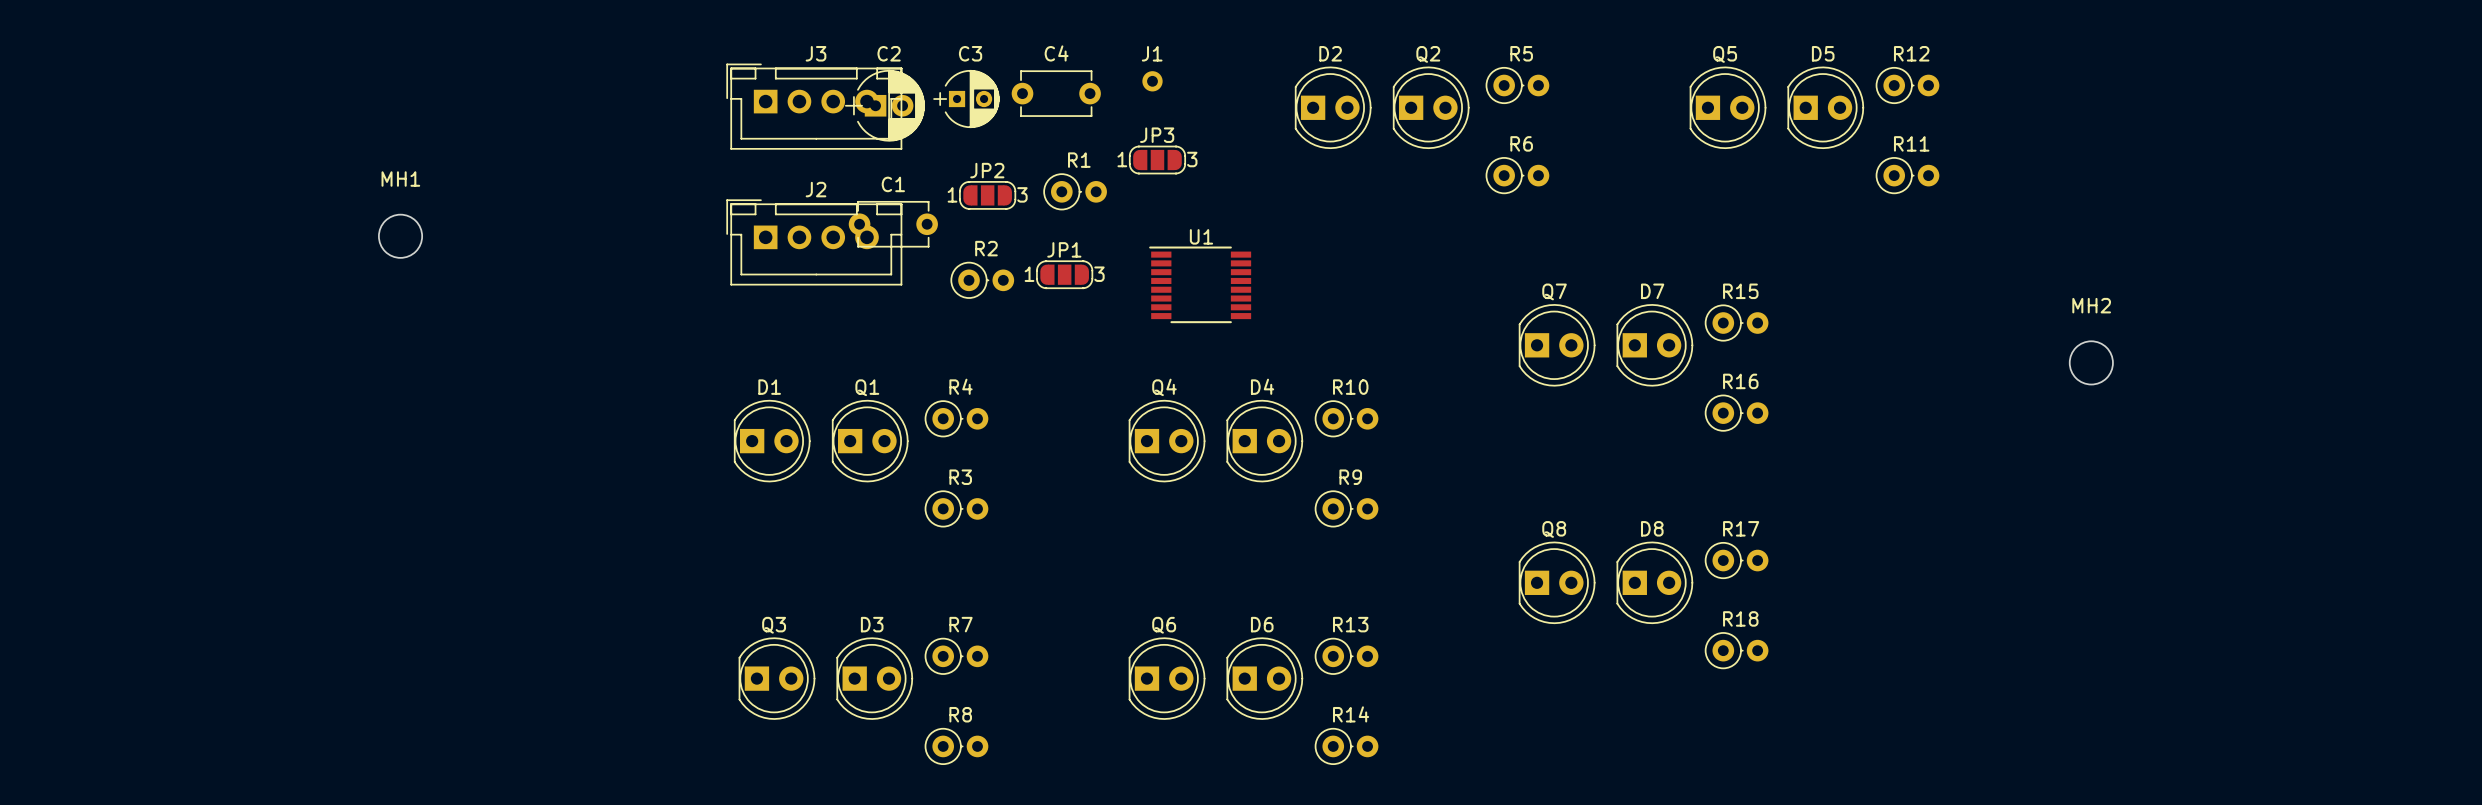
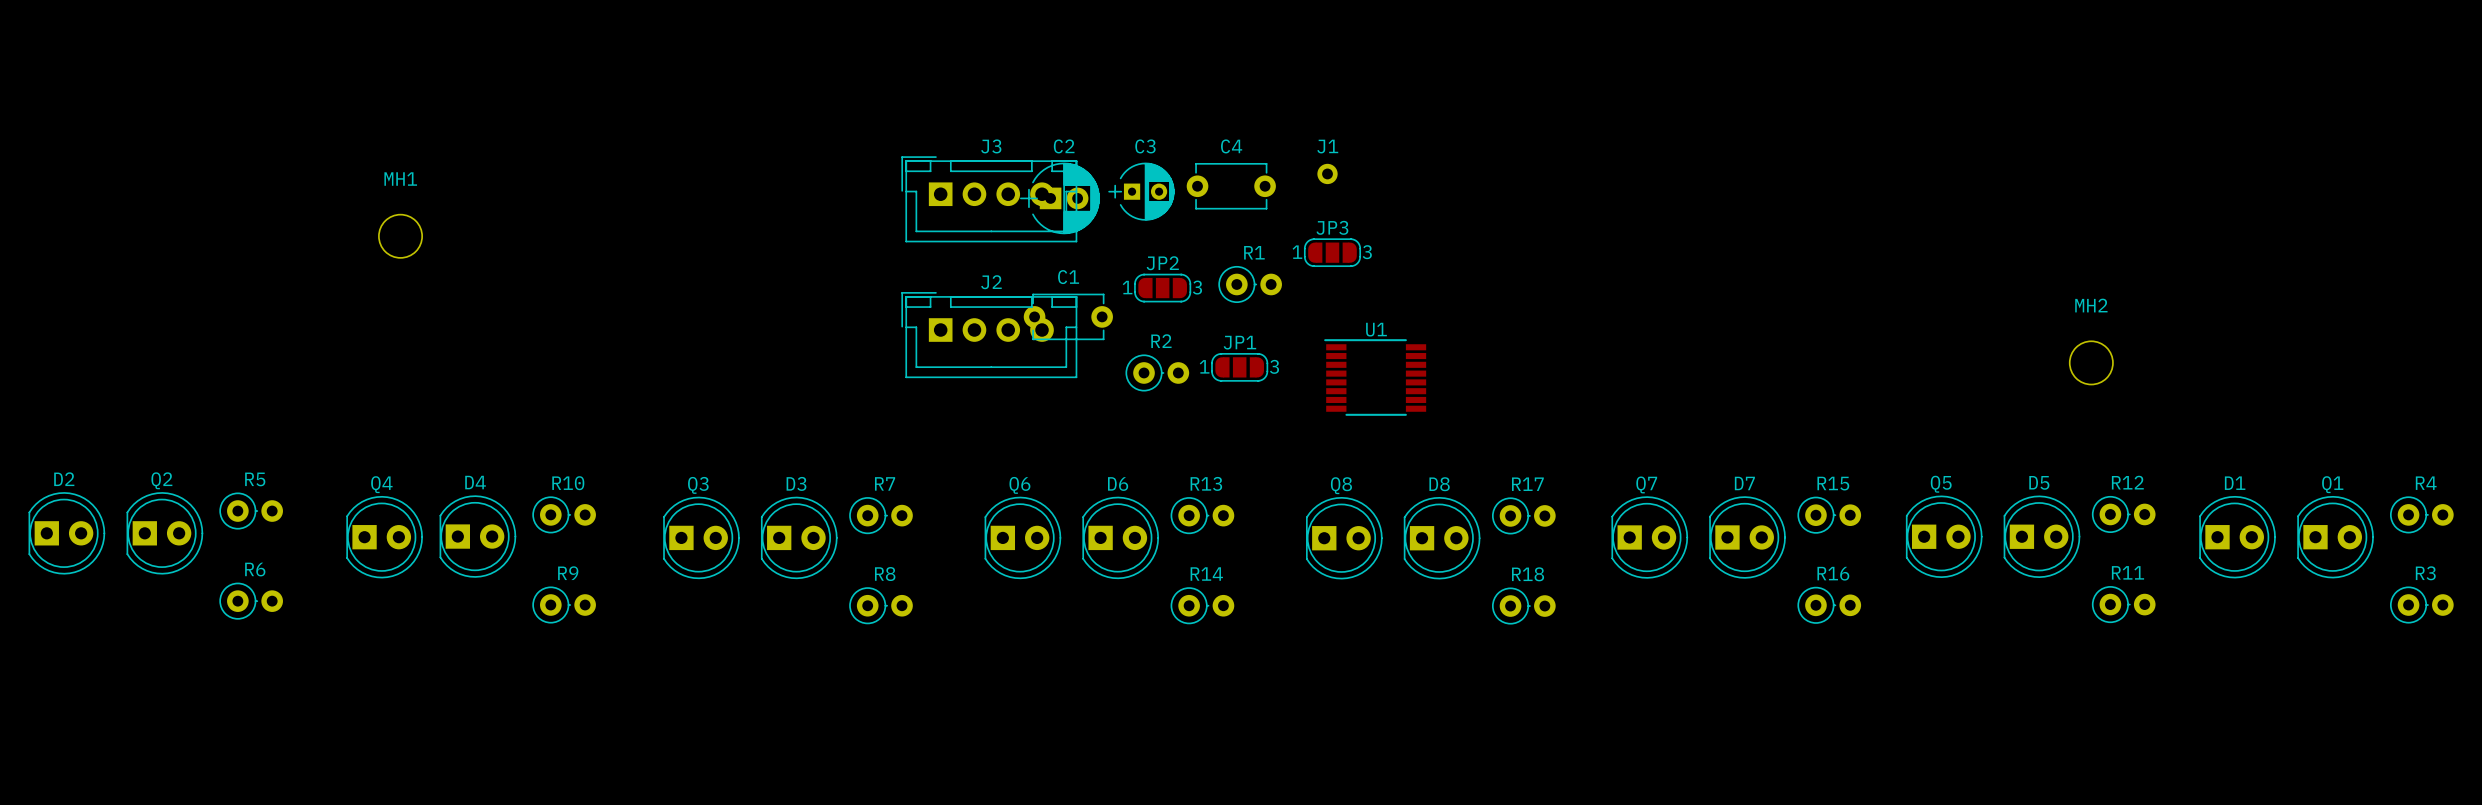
J1 position: (1152, 81) -> (1327, 173)
R5 position: (1517, 85) -> (251, 511)
R12 position: (1907, 85) -> (2123, 514)
C4 position: (1056, 93) -> (1231, 186)
C3 position: (966, 99) -> (1141, 191)
C2 position: (884, 105) -> (1059, 198)
J3 position: (814, 106) -> (989, 199)
D2 position: (1333, 107) -> (66, 533)
Q2 position: (1431, 107) -> (164, 533)
Q5 position: (1728, 107) -> (1944, 536)
D5 position: (1825, 107) -> (2041, 536)
JP3 position: (1157, 160) -> (1332, 252)
R6 position: (1517, 175) -> (251, 601)
R11 position: (1907, 175) -> (2123, 604)
R1 position: (1075, 191) -> (1250, 284)
JP2 position: (987, 195) -> (1162, 288)
C1 position: (893, 224) -> (1068, 316)
J2 position: (814, 242) -> (989, 335)
JP1 position: (1064, 274) -> (1239, 367)
R2 position: (982, 280) -> (1157, 372)
U1 position: (1200, 284) -> (1375, 377)
R15 position: (1736, 323) -> (1829, 515)
Q7 position: (1557, 345) -> (1649, 537)
D7 position: (1654, 345) -> (1747, 537)
D4 footprint: [1226, 399, 1304, 483] -> [439, 495, 517, 578]
R16 position: (1736, 413) -> (1829, 605)
R4 position: (956, 418) -> (2421, 514)
R10 position: (1346, 418) -> (564, 514)
D1 position: (772, 441) -> (2237, 537)
Q1 position: (870, 441) -> (2335, 537)
Q4 position: (1167, 441) -> (384, 537)
R3 position: (956, 508) -> (2421, 605)
R9 position: (1346, 508) -> (564, 605)
R17 position: (1736, 560) -> (1523, 515)
Q8 position: (1557, 582) -> (1344, 538)
D8 position: (1654, 582) -> (1442, 538)
R18 position: (1736, 650) -> (1523, 606)
R7 position: (956, 656) -> (881, 515)
R13 position: (1346, 656) -> (1202, 515)
Q3 position: (776, 678) -> (701, 537)
D3 position: (874, 678) -> (799, 537)
Q6 position: (1167, 678) -> (1022, 537)
D6 position: (1264, 678) -> (1120, 537)
R8 position: (956, 746) -> (881, 605)
R14 position: (1346, 746) -> (1202, 605)

